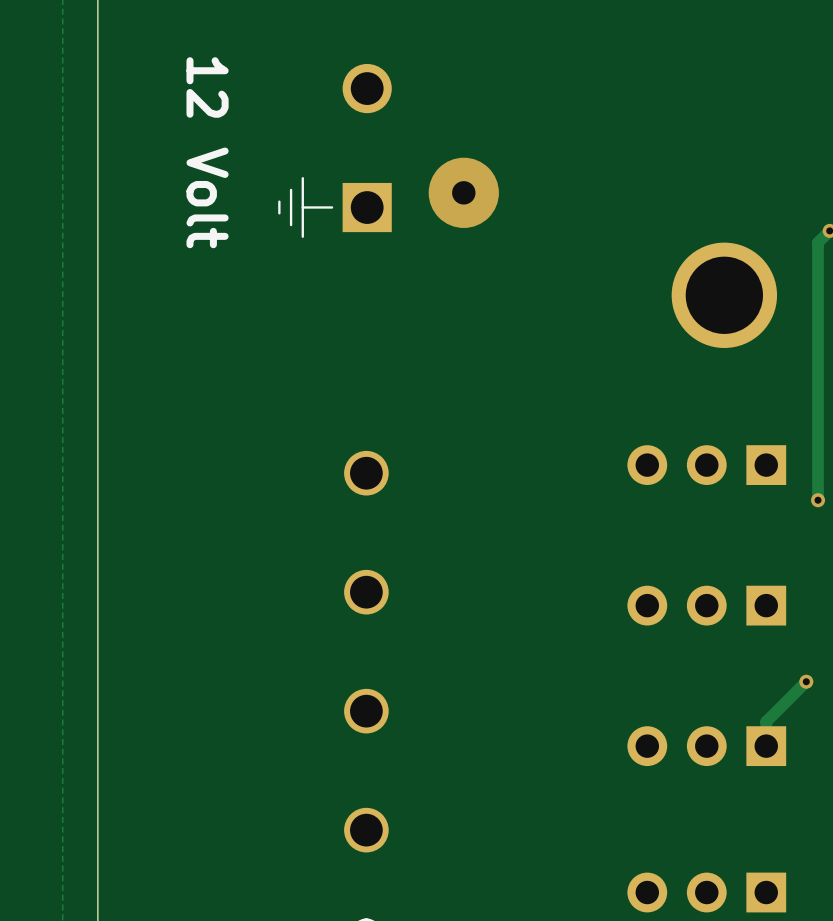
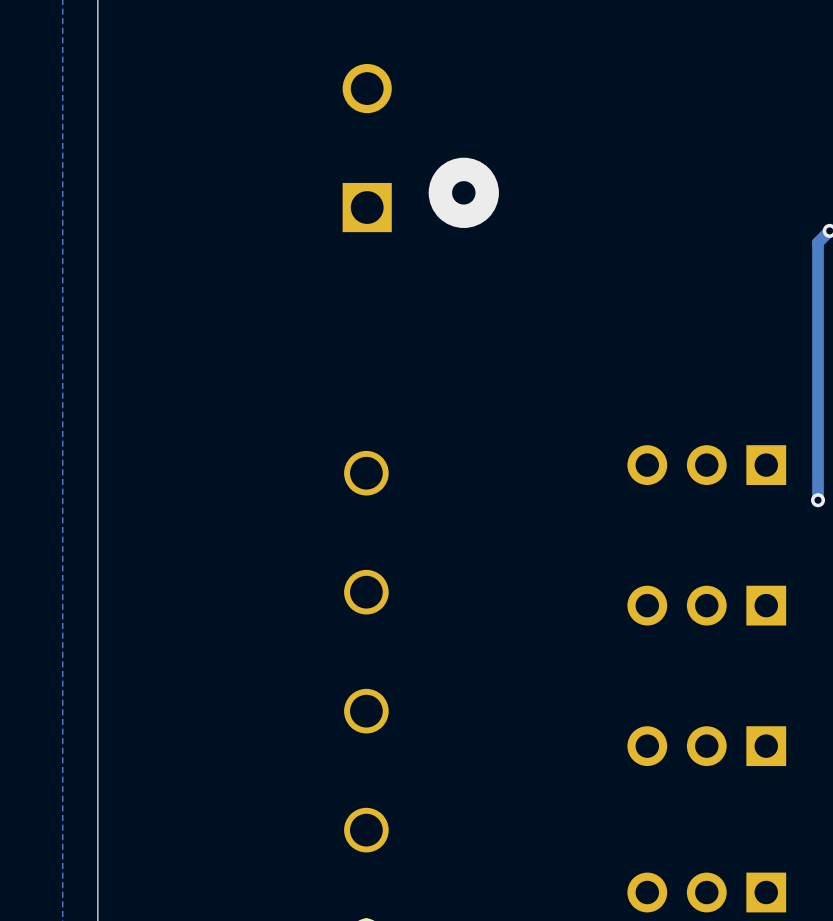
text: 12 Volt (207, 152) -> none
line: (302, 178) (302, 236) -> none
line: (291, 189) (291, 225) -> none
line: (279, 201) (279, 213) -> none
line: (332, 207) (302, 207) -> none
part: (724, 295) -> none
track: (806, 681) (766, 721) (766, 746) -> none
via: (806, 681) -> none

